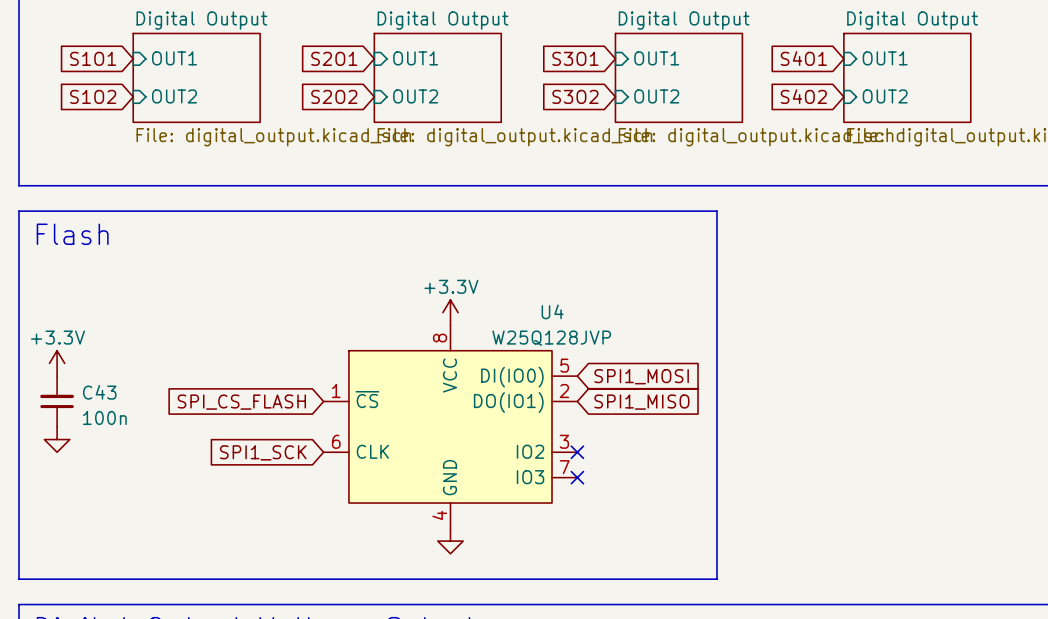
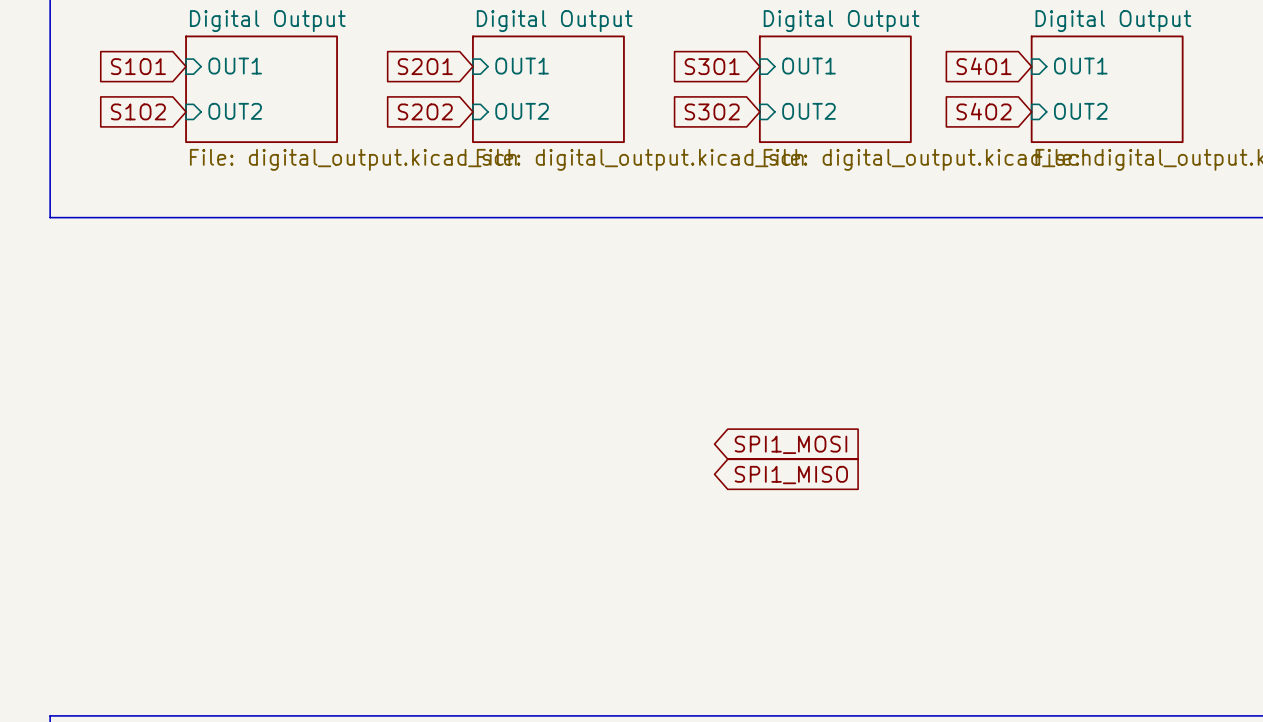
line: (19, 211) (716, 211) (716, 579) (19, 579) (19, 211) -> none
text: Flash (72, 234) -> none
power symbol: +3.3V (450, 312) -> none
power symbol: +3.3V (57, 363) -> none
C43: 100n (57, 401) -> none
global label: SPI_CS_FLASH (241, 402) -> none
U4: W25Q128JVP (450, 426) -> none
power symbol: (57, 439) -> none
global label: SPI1_SCK (263, 452) -> none
no-connect mark: (577, 452) -> none
no-connect mark: (577, 477) -> none
power symbol: (450, 541) -> none

